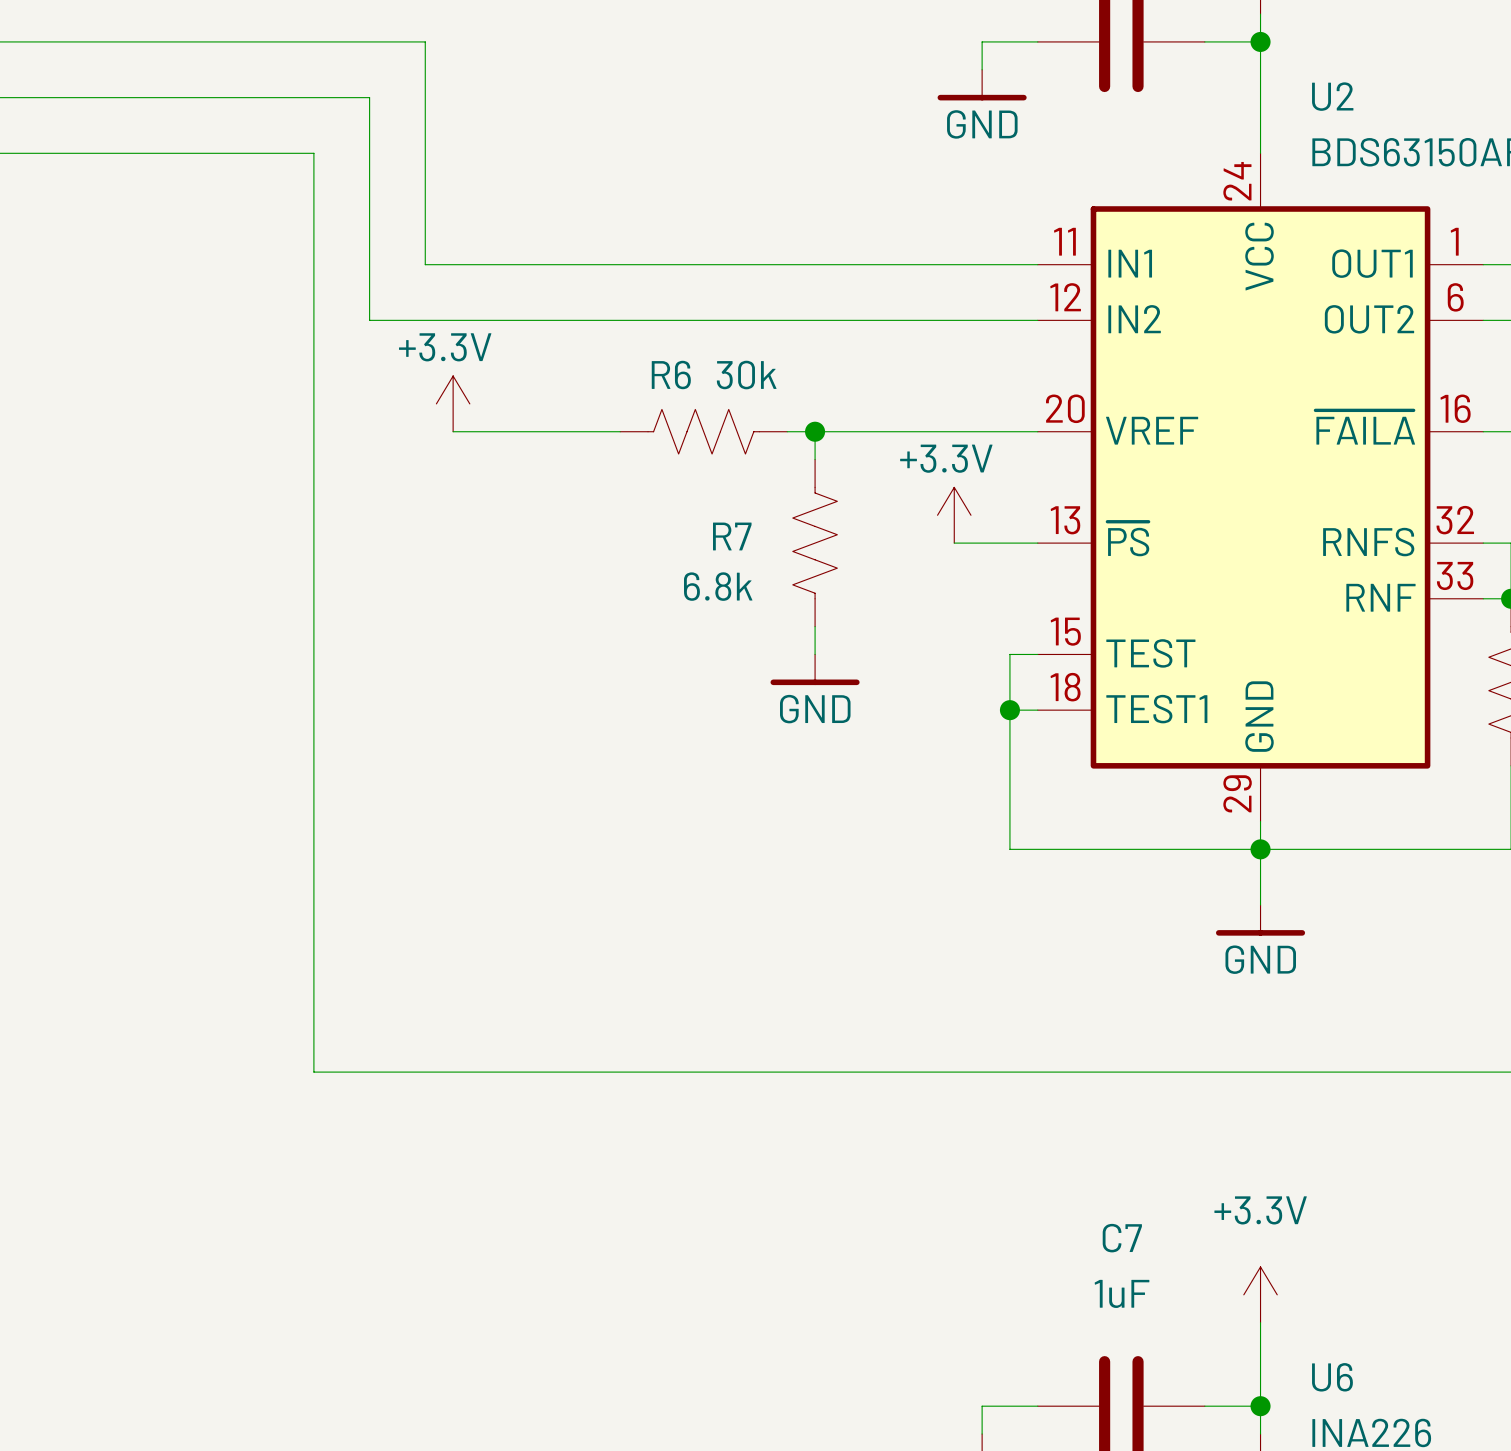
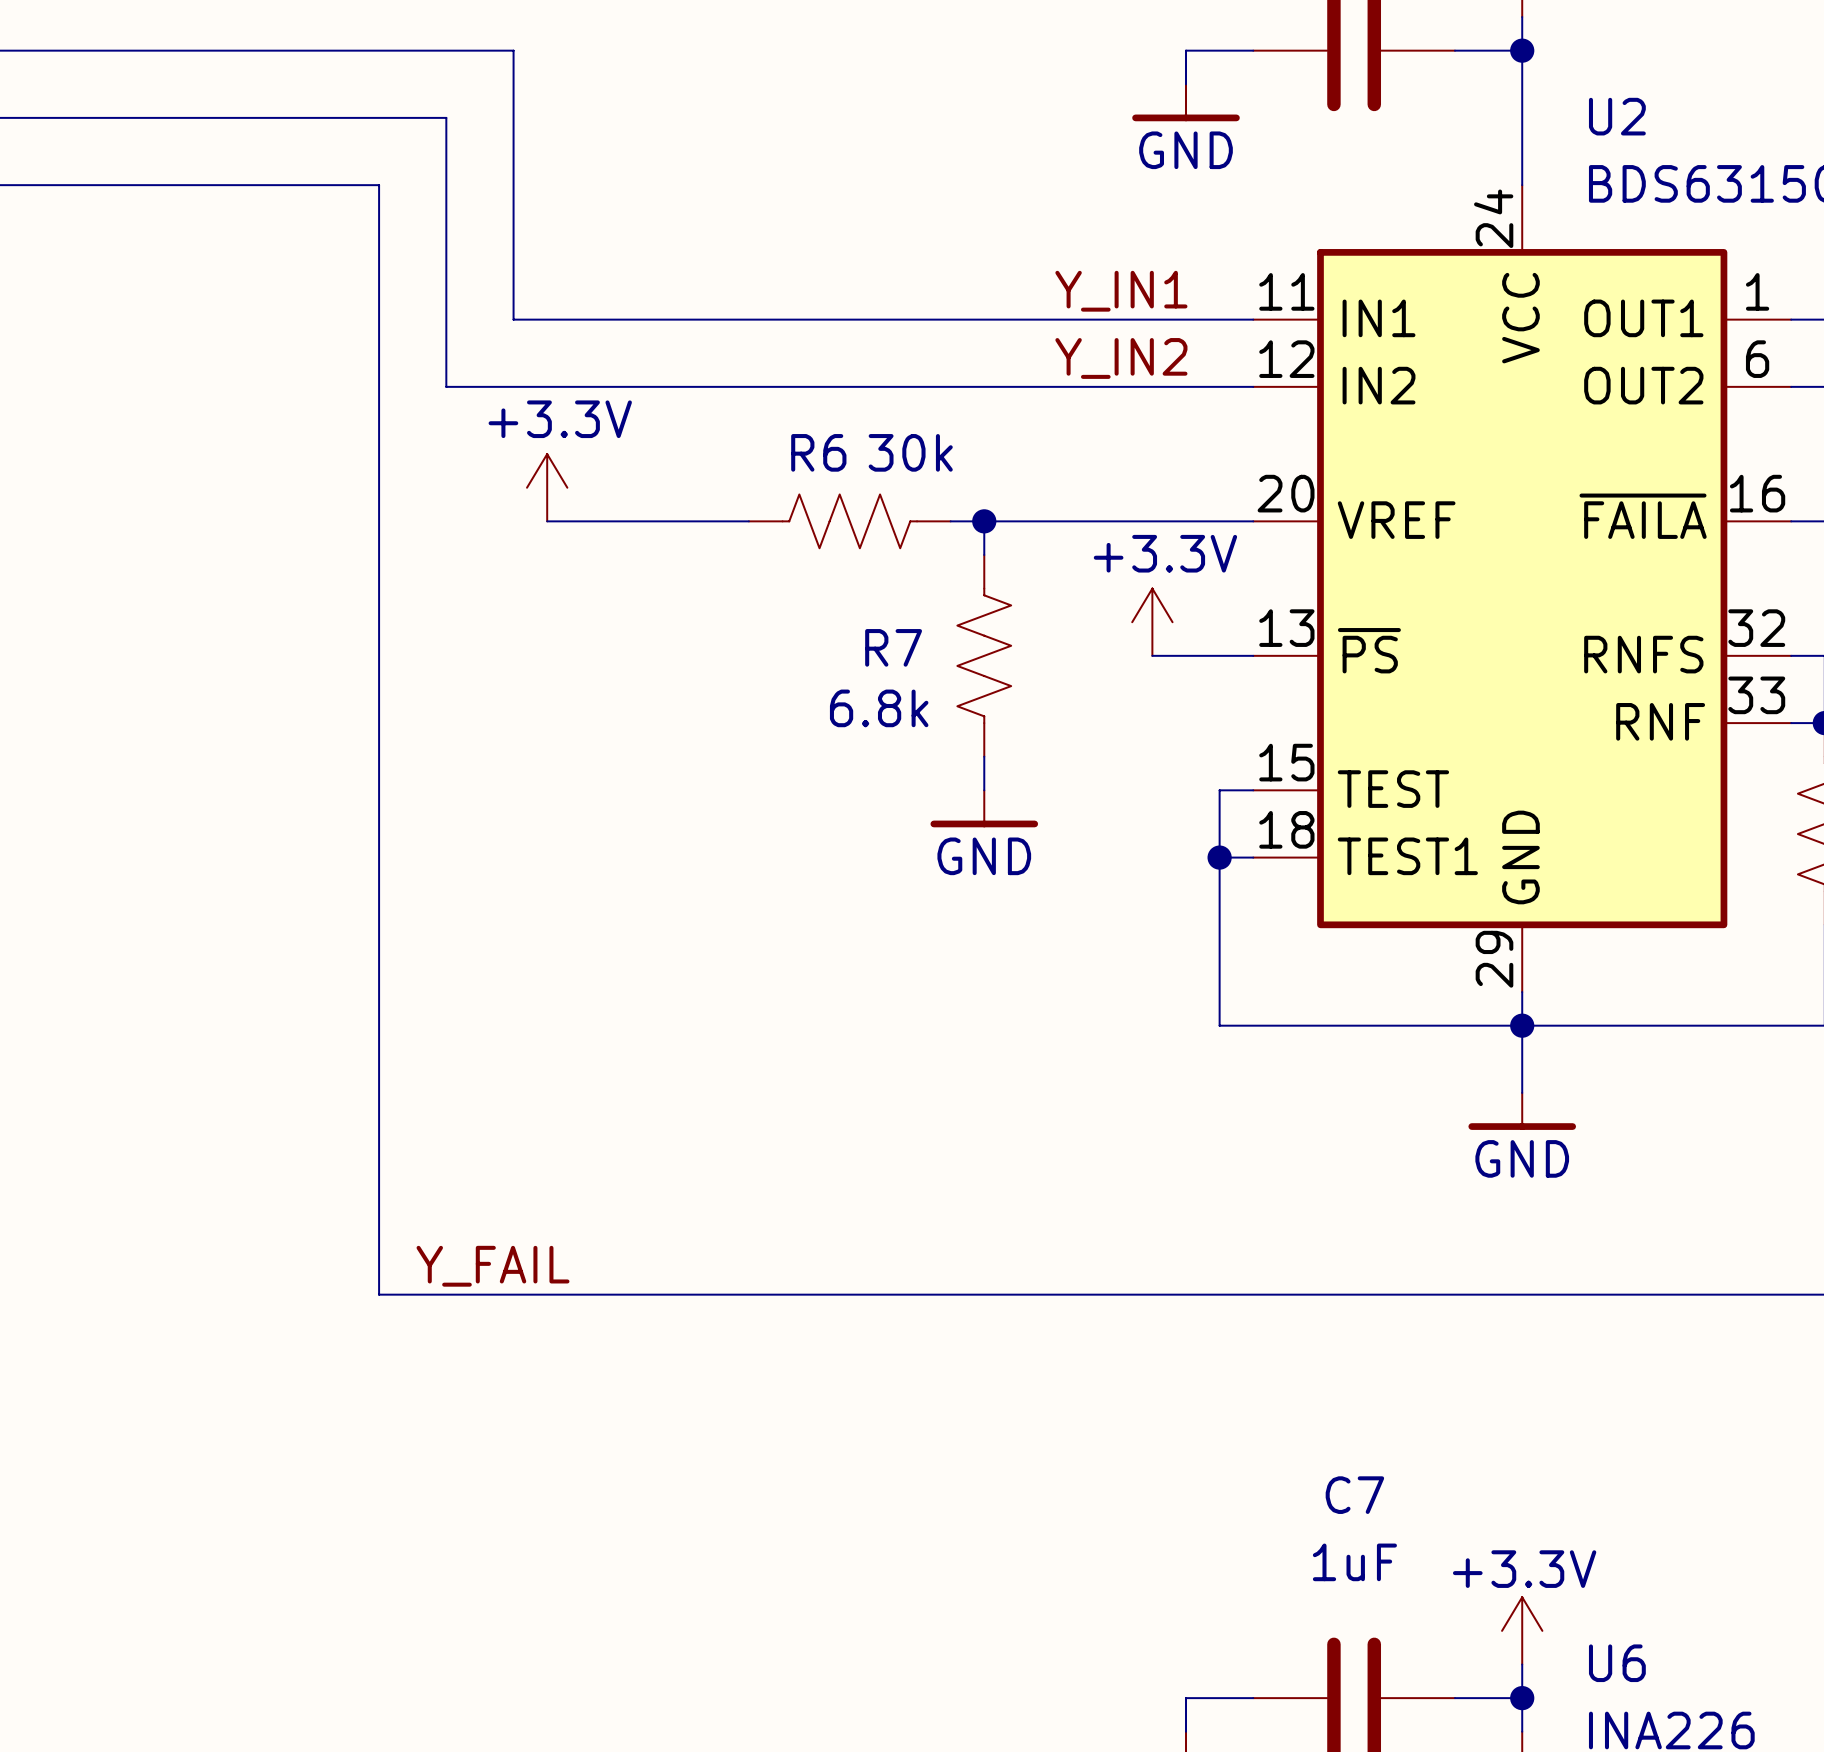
label: none -> Y_IN1 (1121, 291)
label: none -> Y_IN2 (1121, 358)
label: none -> Y_FAIL (493, 1266)
power symbol text position: +3.3V (1260, 1210) -> +3.3V (1524, 1569)
power symbol position: +3.3V (1260, 1294) -> +3.3V (1522, 1630)

